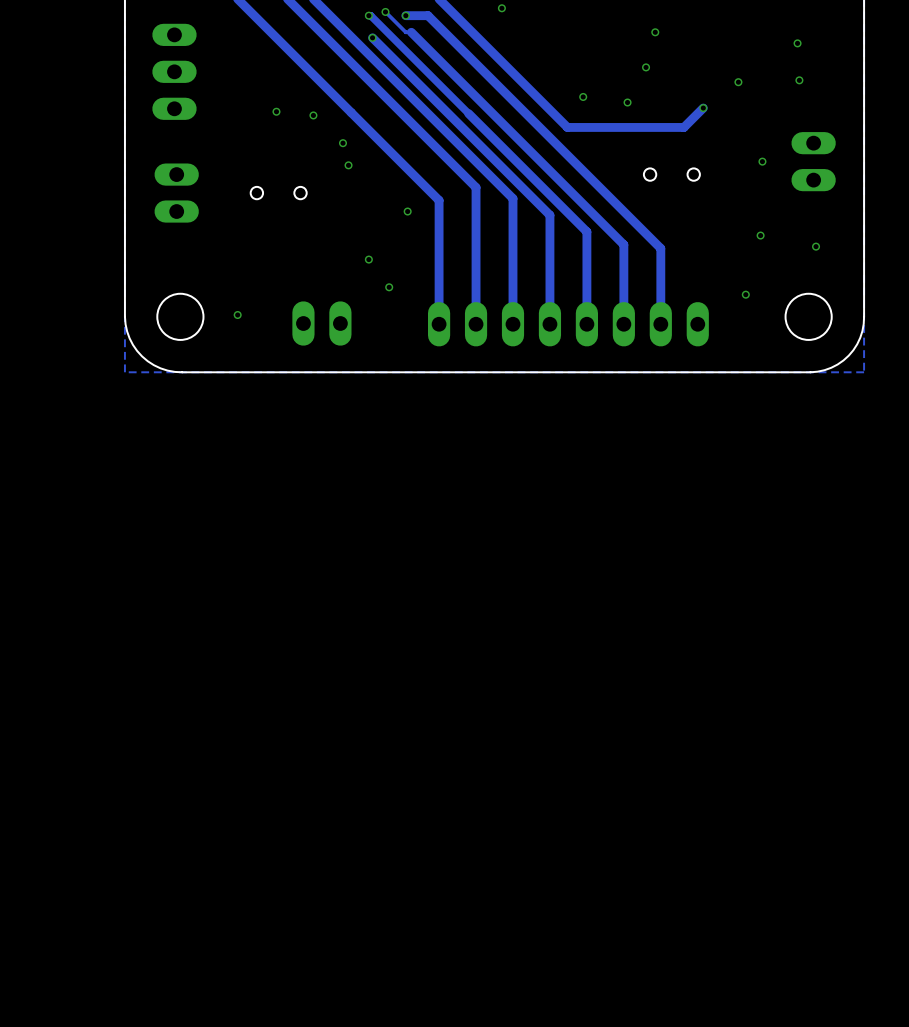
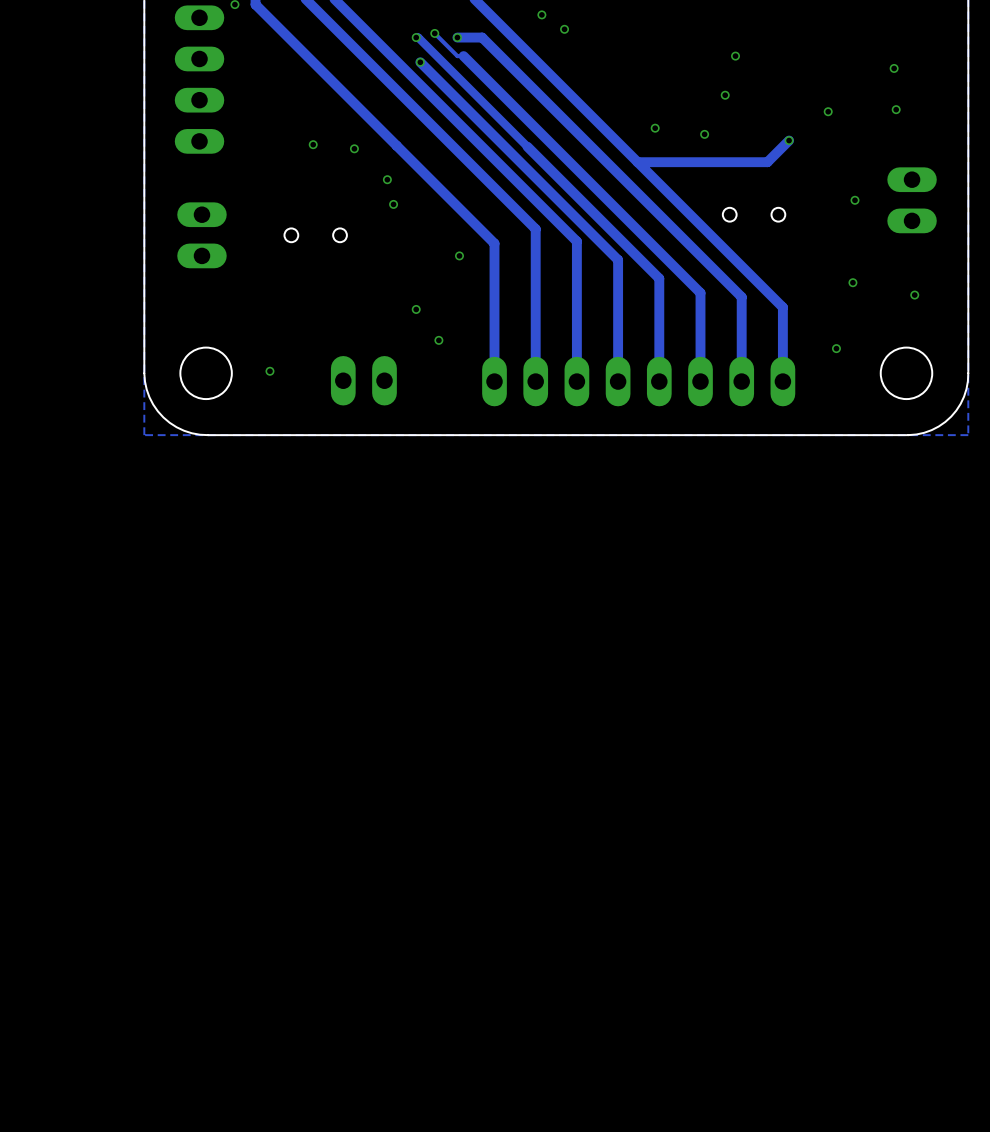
track: none -> (637, 162) (782, 307) (782, 381)

